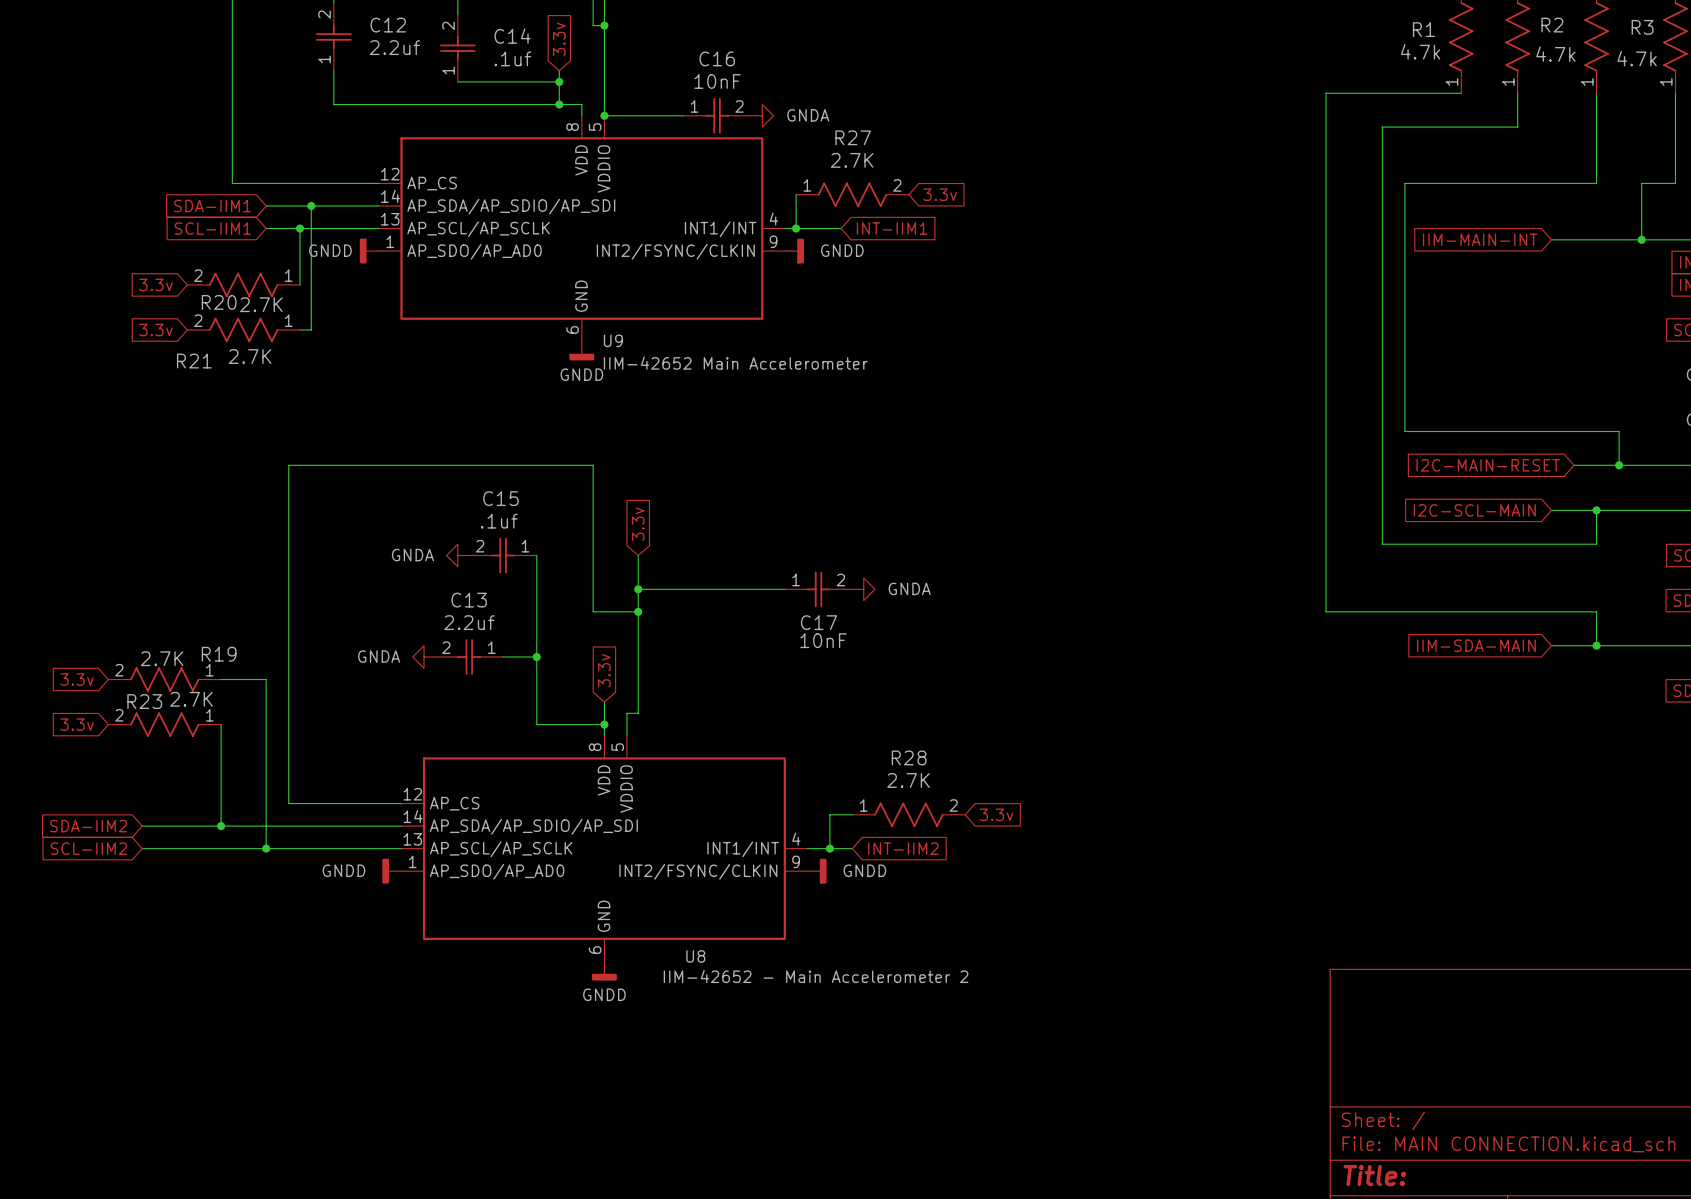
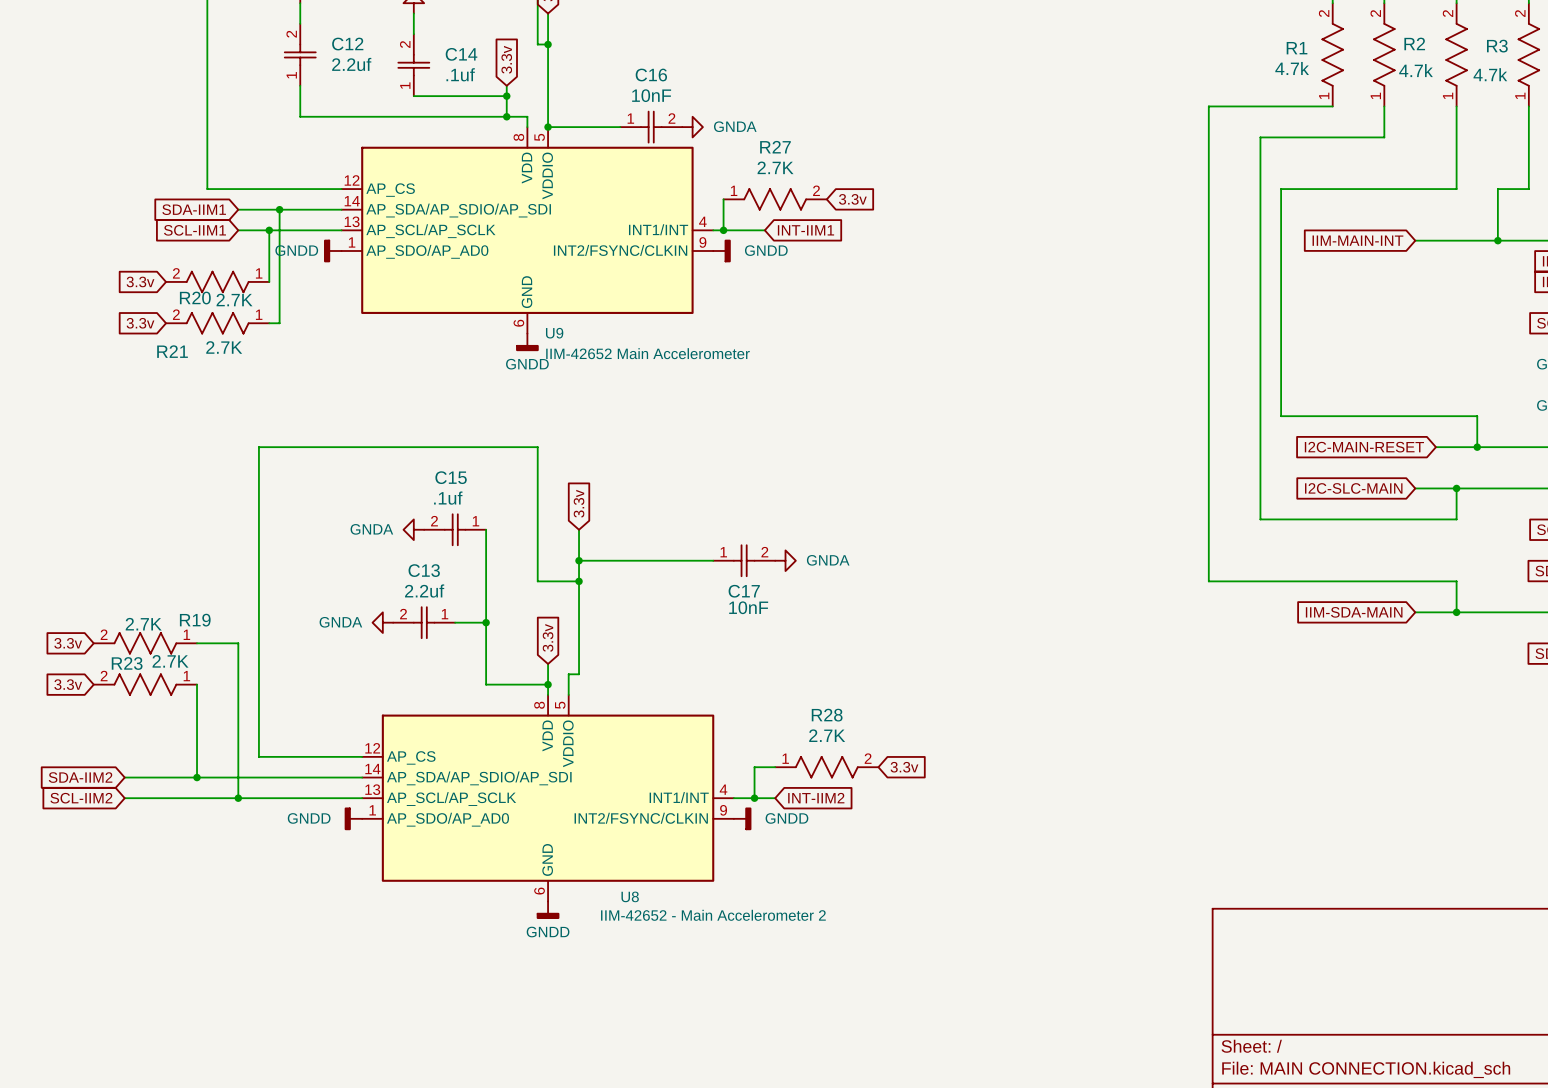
global label: I2C-SCL-MAIN (1474, 510) -> I2C-SLC-MAIN (1353, 488)

